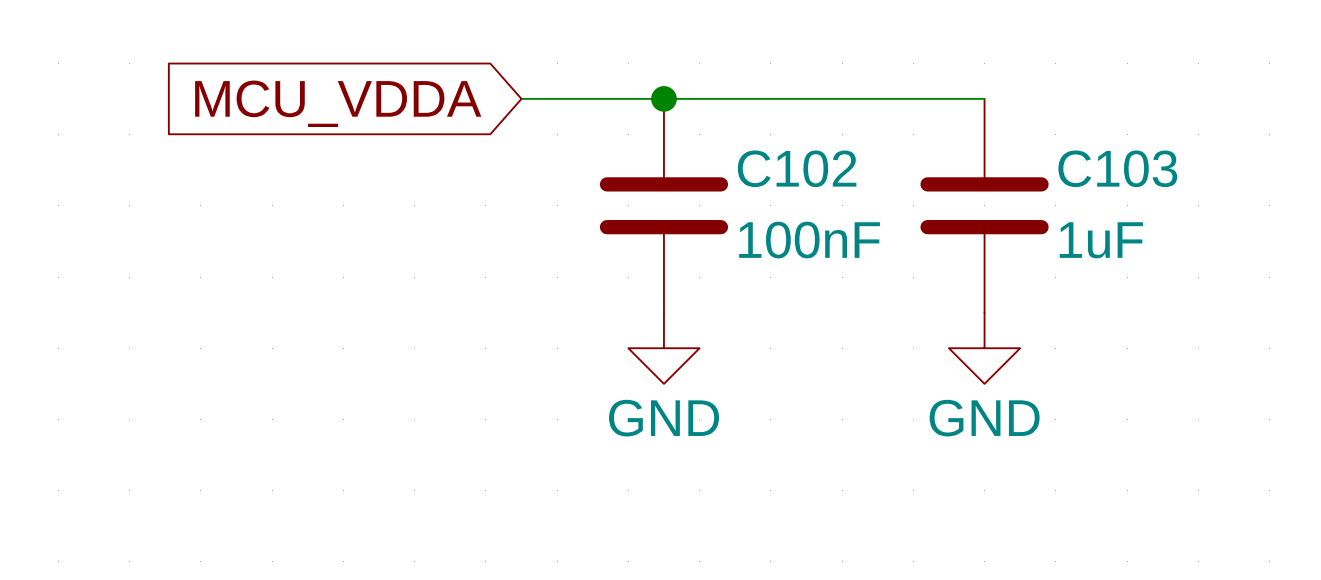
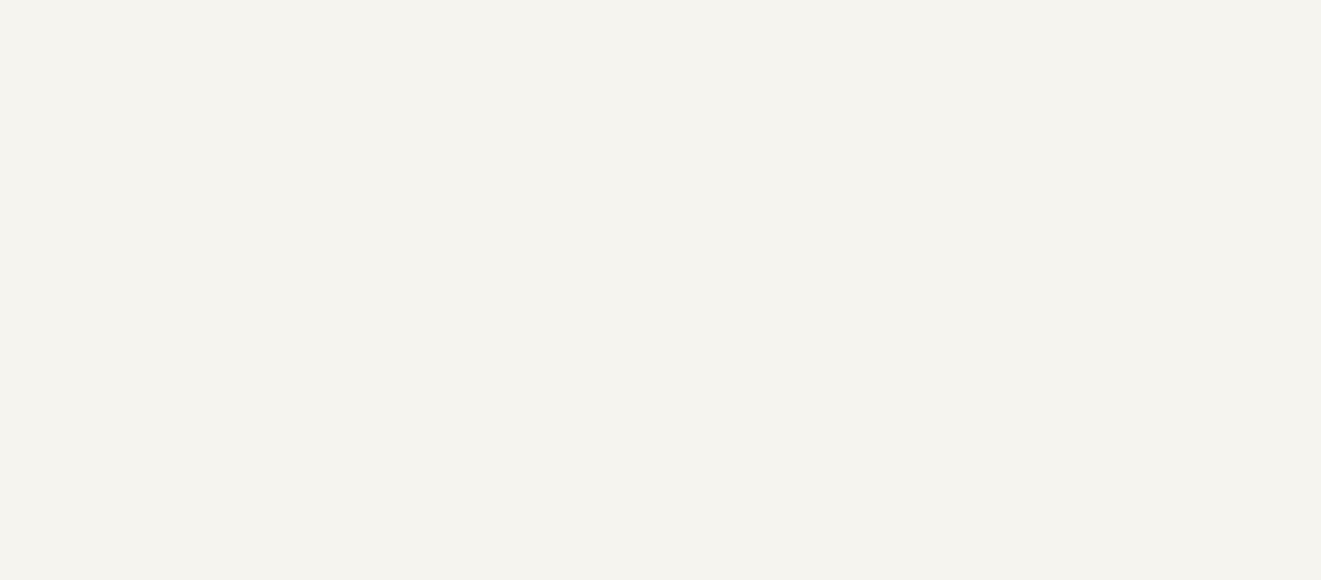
wire: (521, 98) (984, 98) -> none
junction: (663, 98) -> none
global label: MCU_VDDA (338, 103) -> none
C102: 100nF (663, 205) -> none
C103: 1uF (984, 205) -> none
power symbol: GND (663, 348) -> none
power symbol: GND (984, 348) -> none

